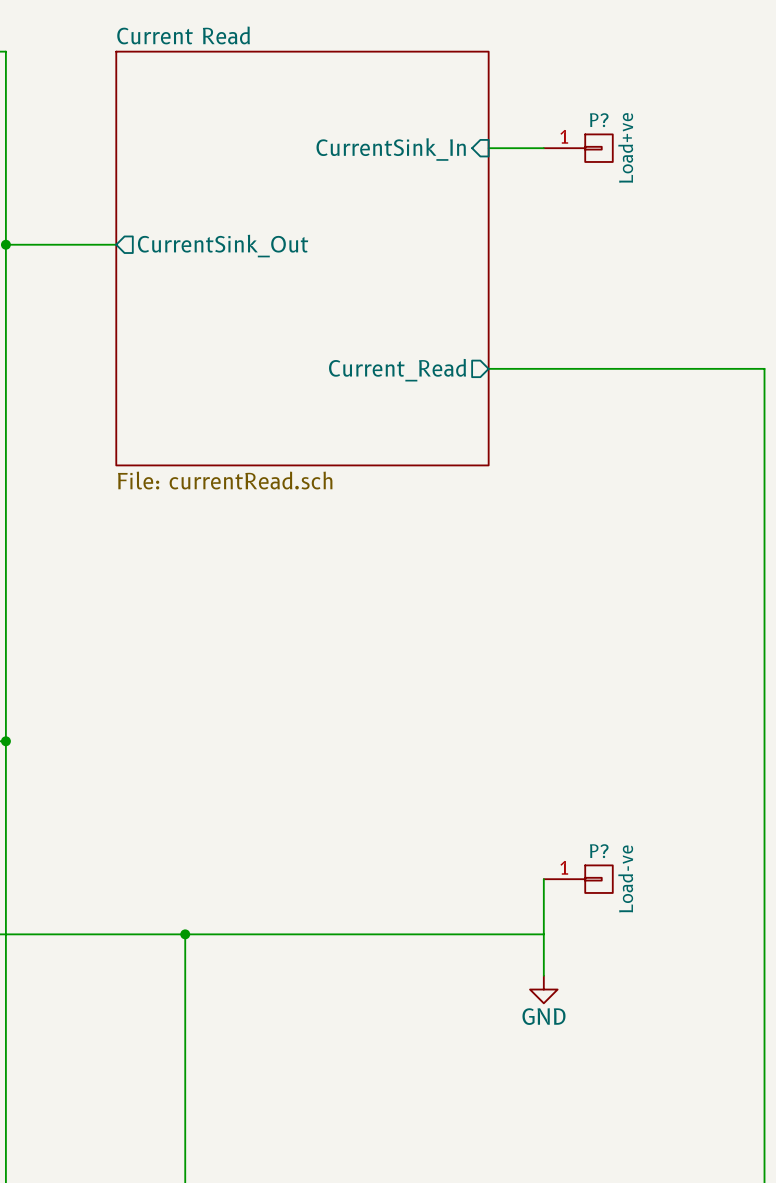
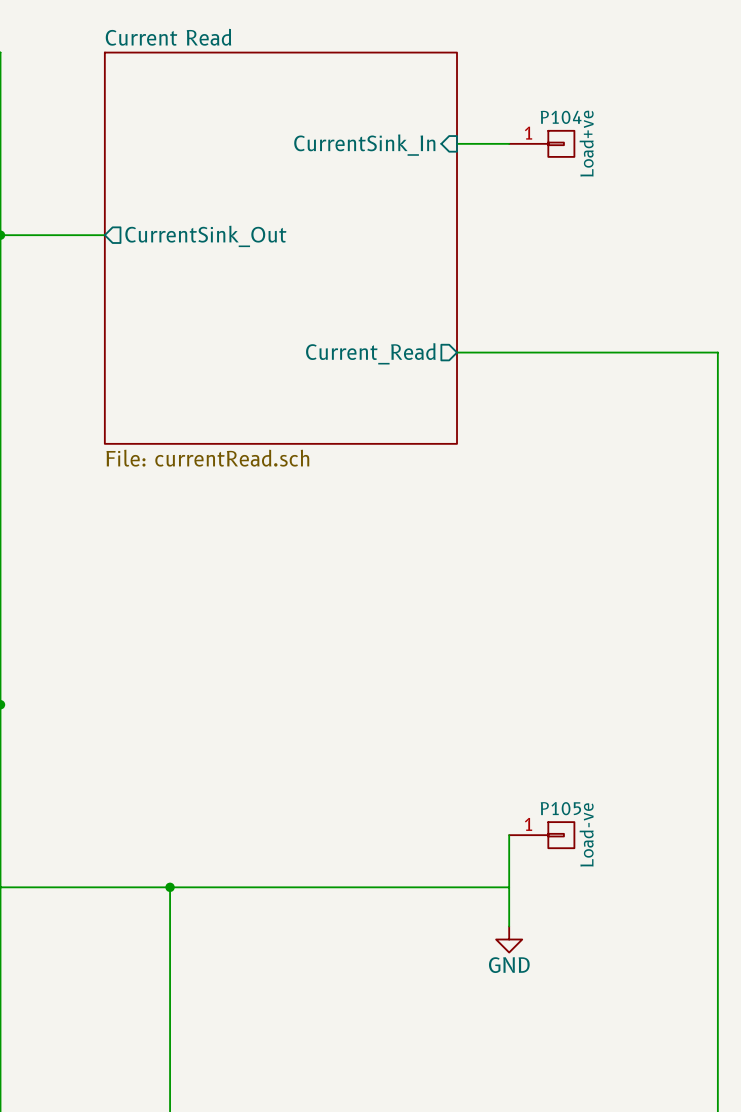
P? name: P? (599, 120) -> P104 (561, 117)
P? name: P? (599, 851) -> P105 (560, 808)

